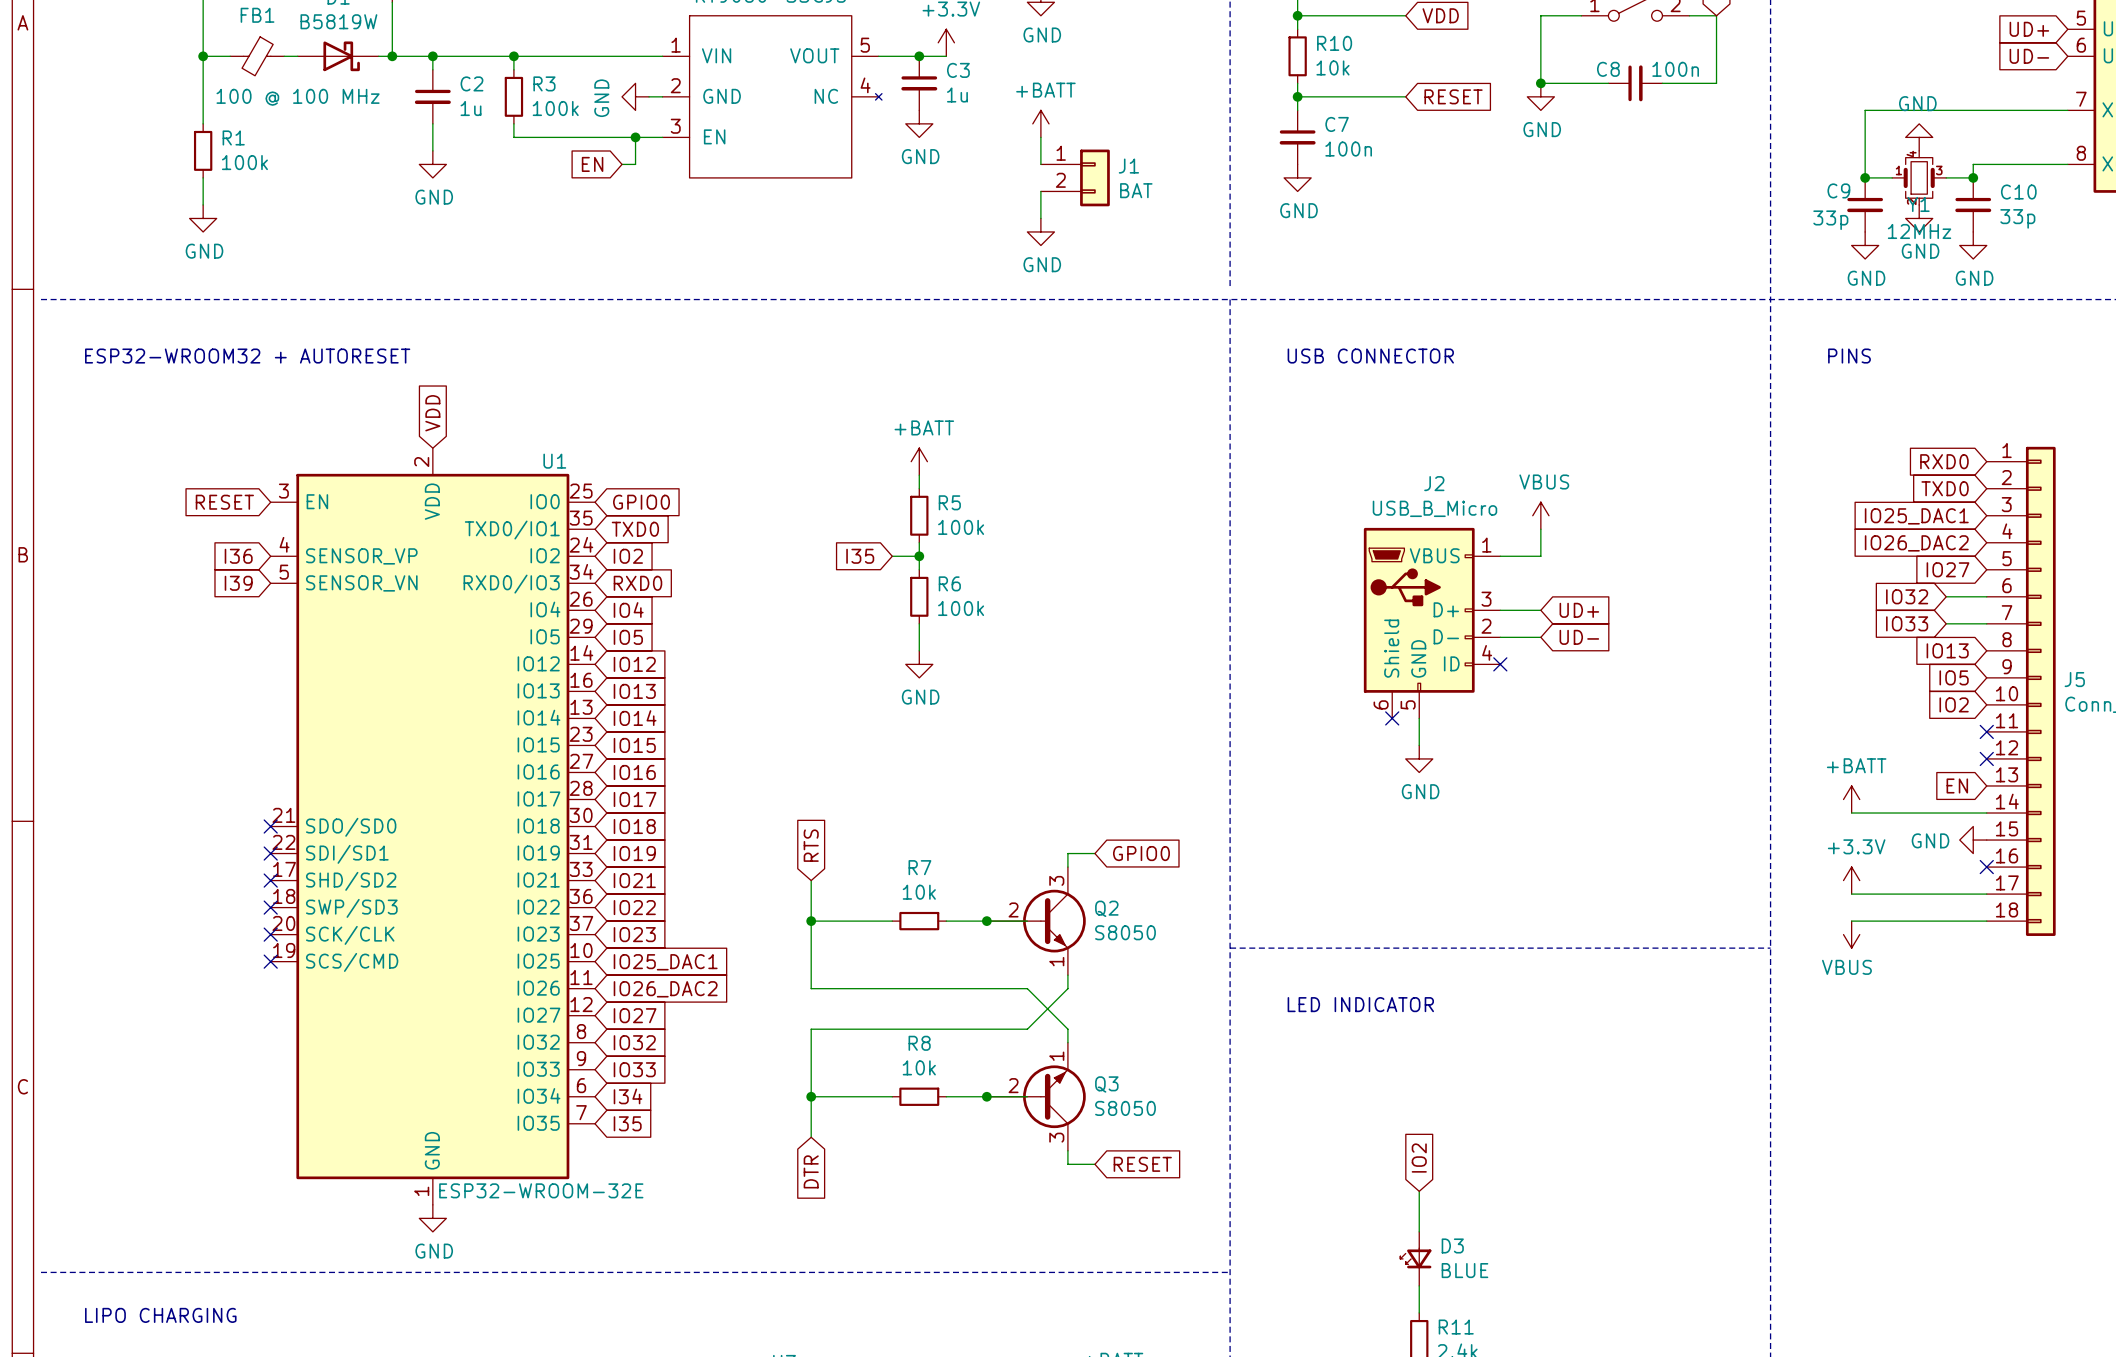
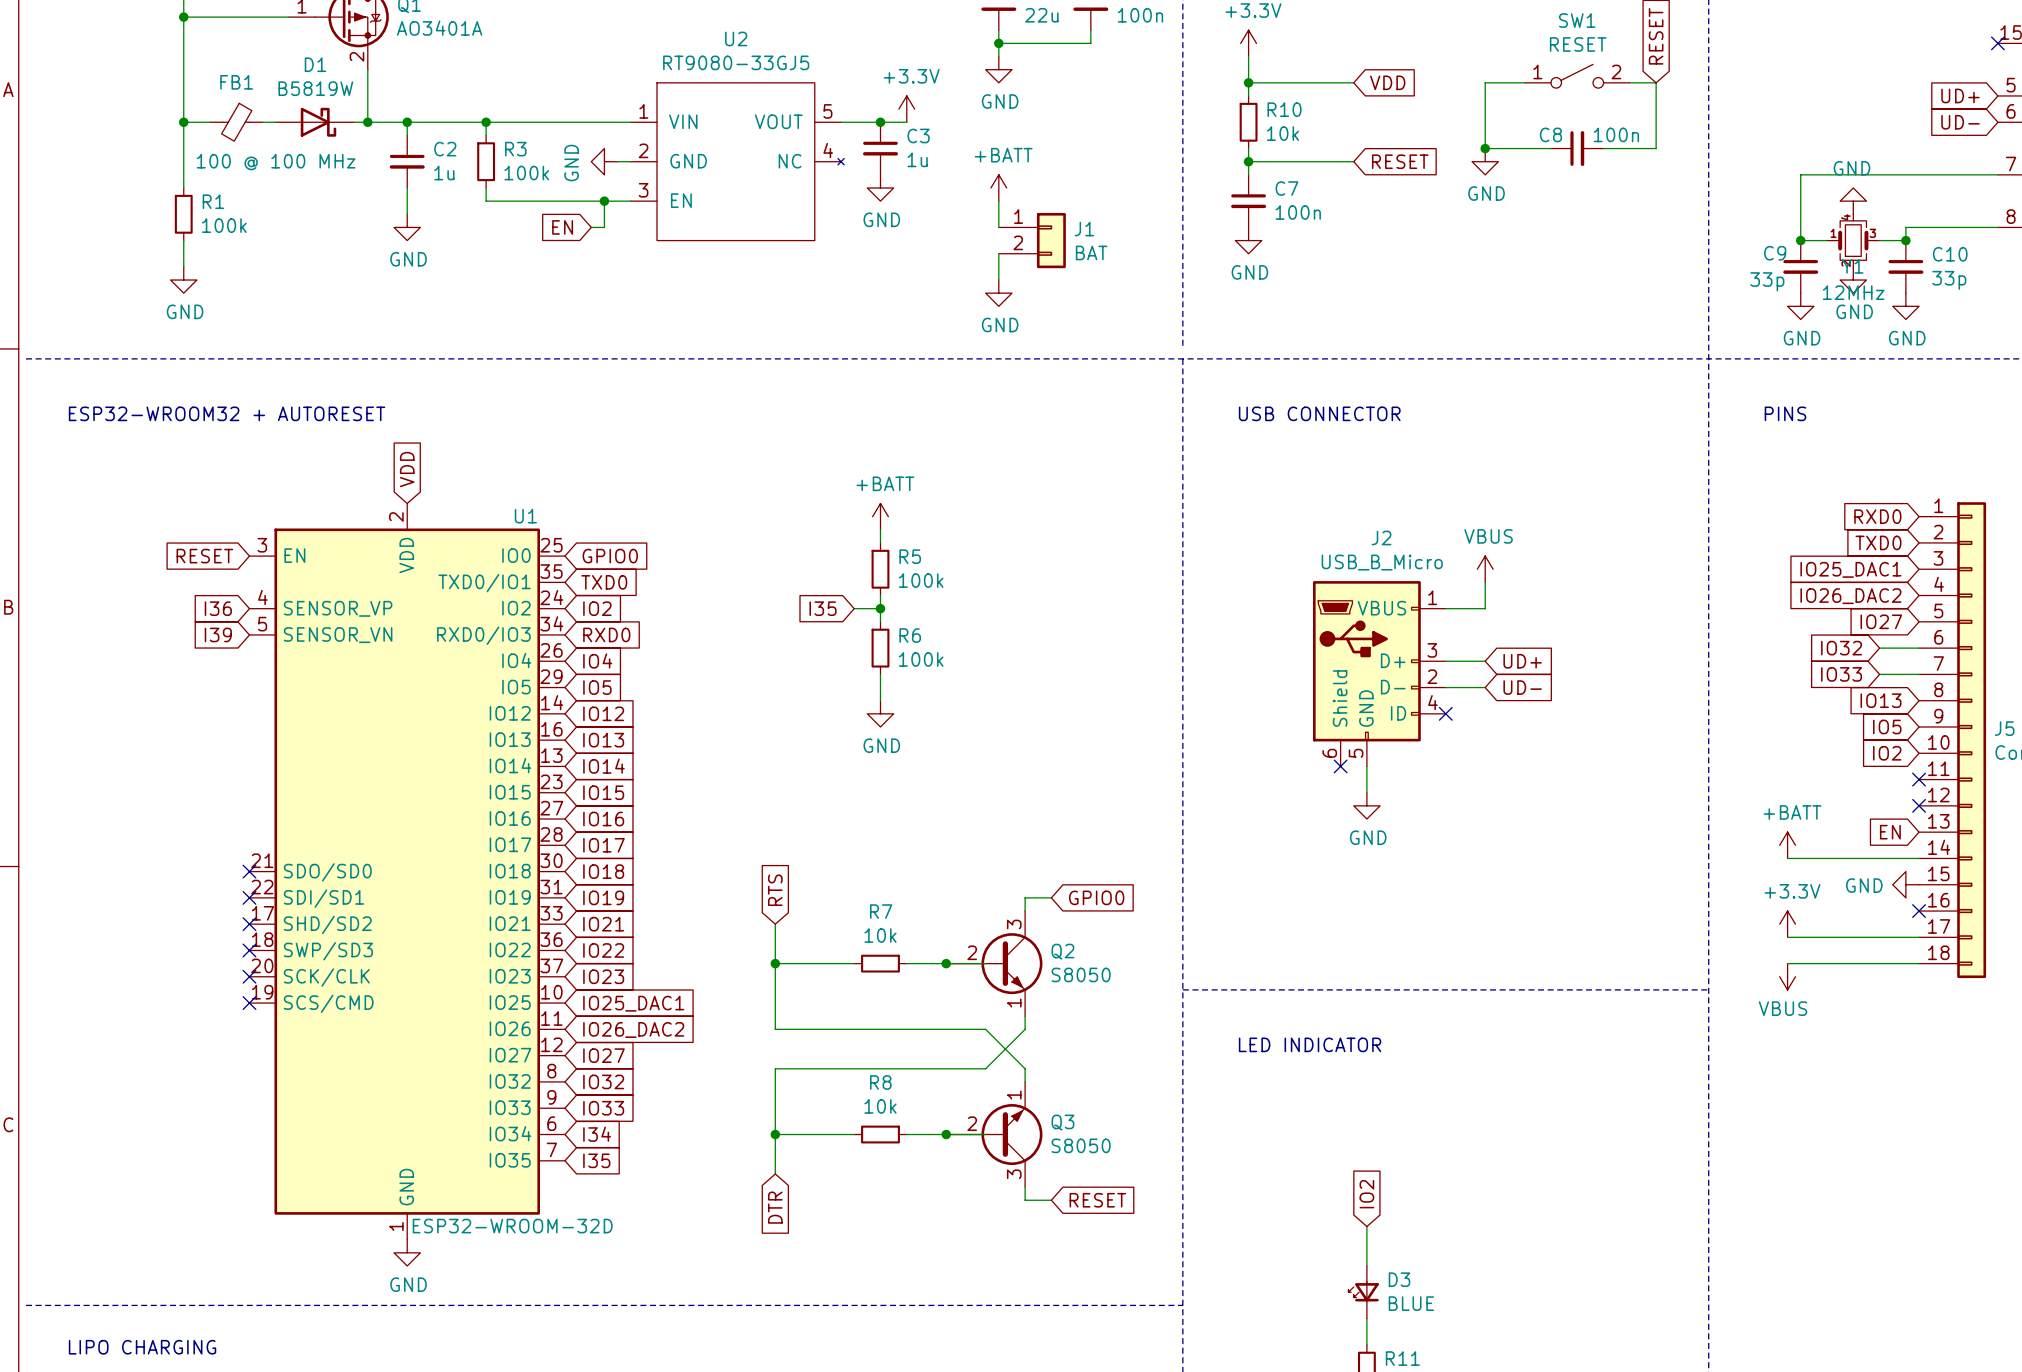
U1 value: ESP32-WROOM-32E (541, 1190) -> ESP32-WROOM-32D (512, 1226)

